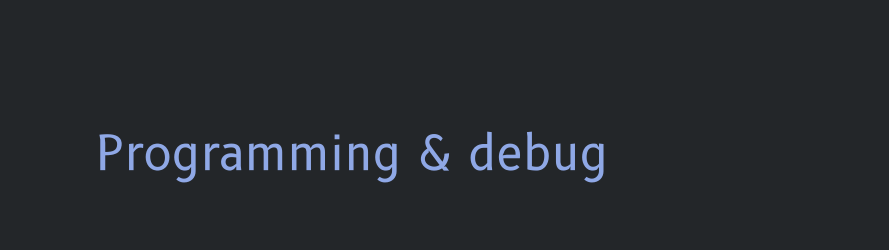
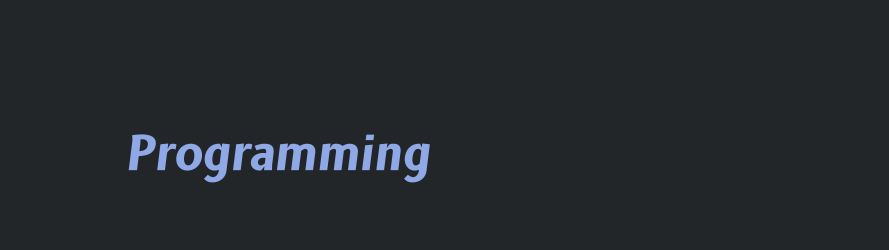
text: Programming & debug (351, 157) -> Programming (279, 158)

